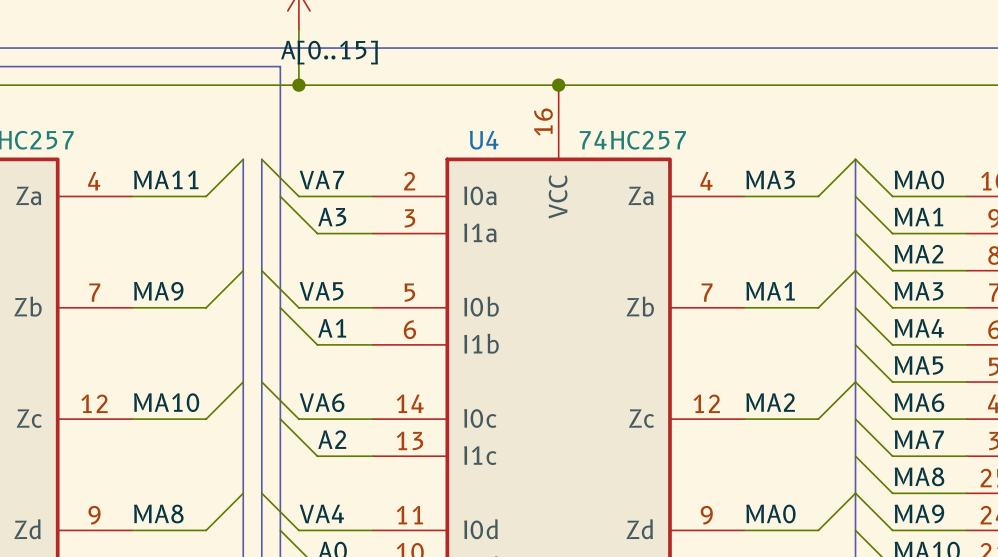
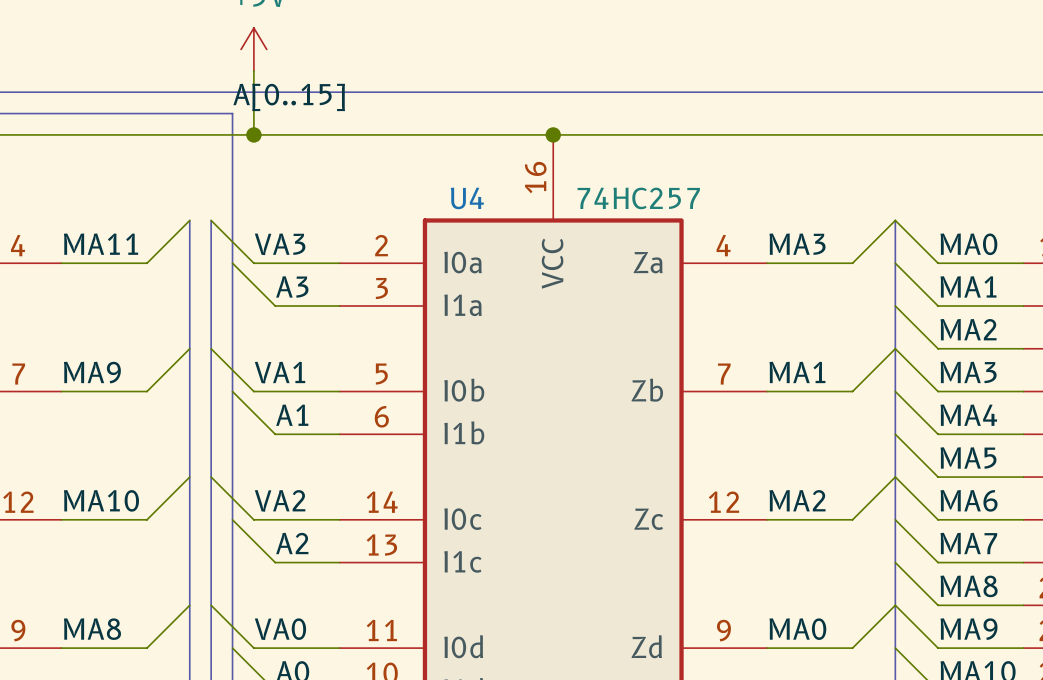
label: VA7 (321, 180) -> VA3 (280, 244)
label: VA5 (321, 291) -> VA1 (280, 372)
label: VA6 (322, 402) -> VA2 (280, 500)
label: VA4 (321, 513) -> VA0 (280, 629)

